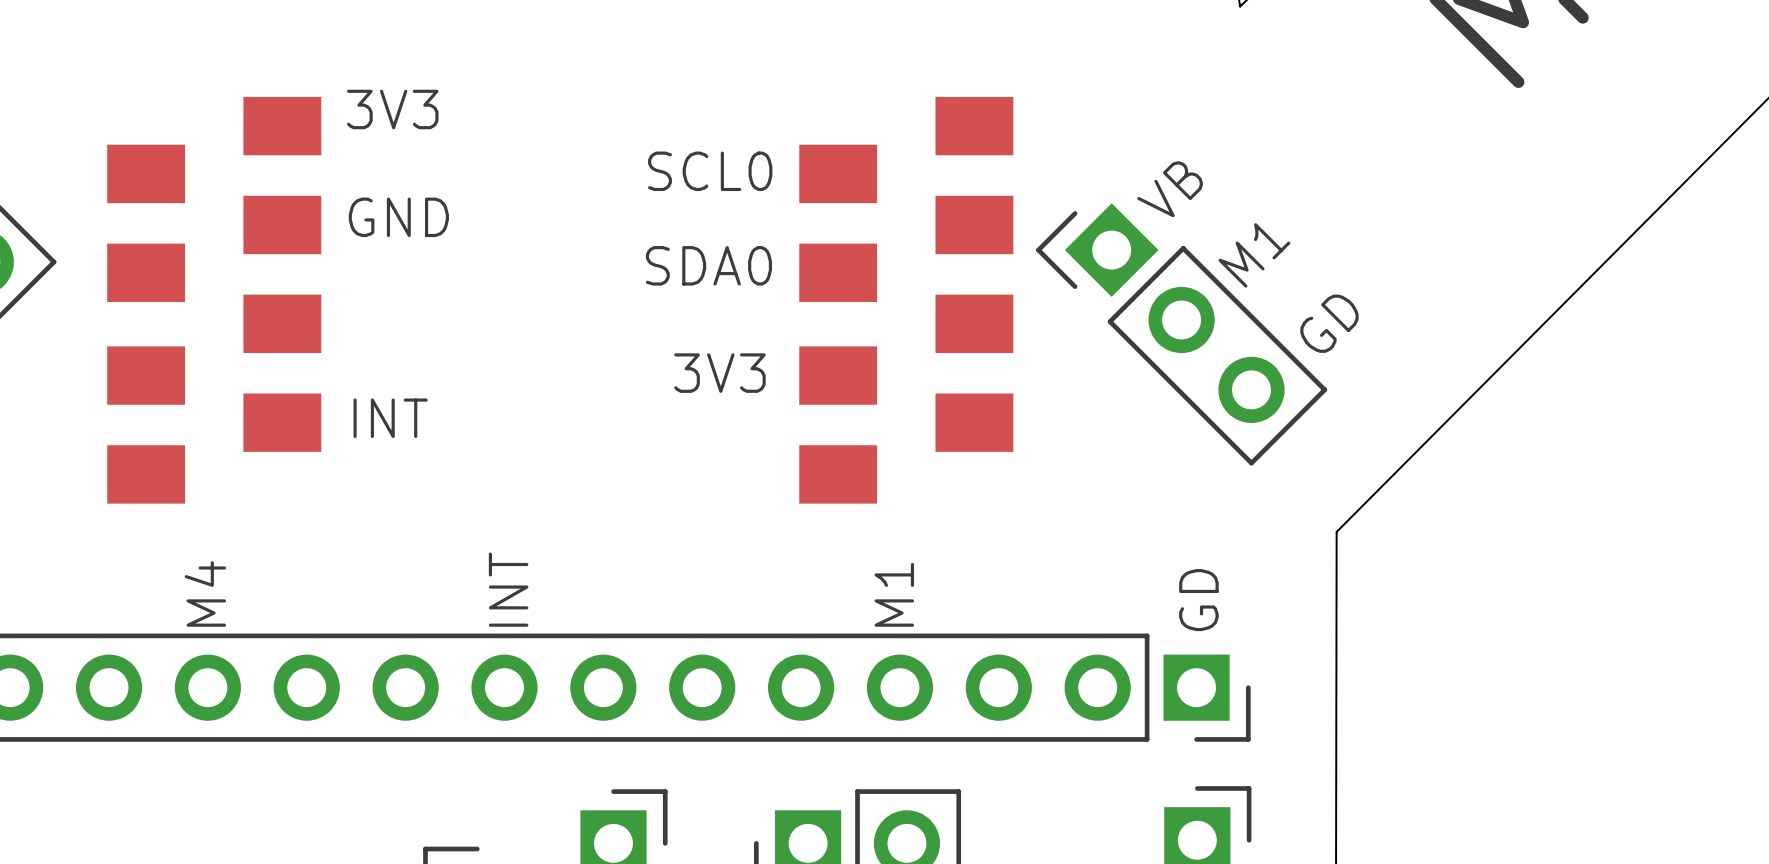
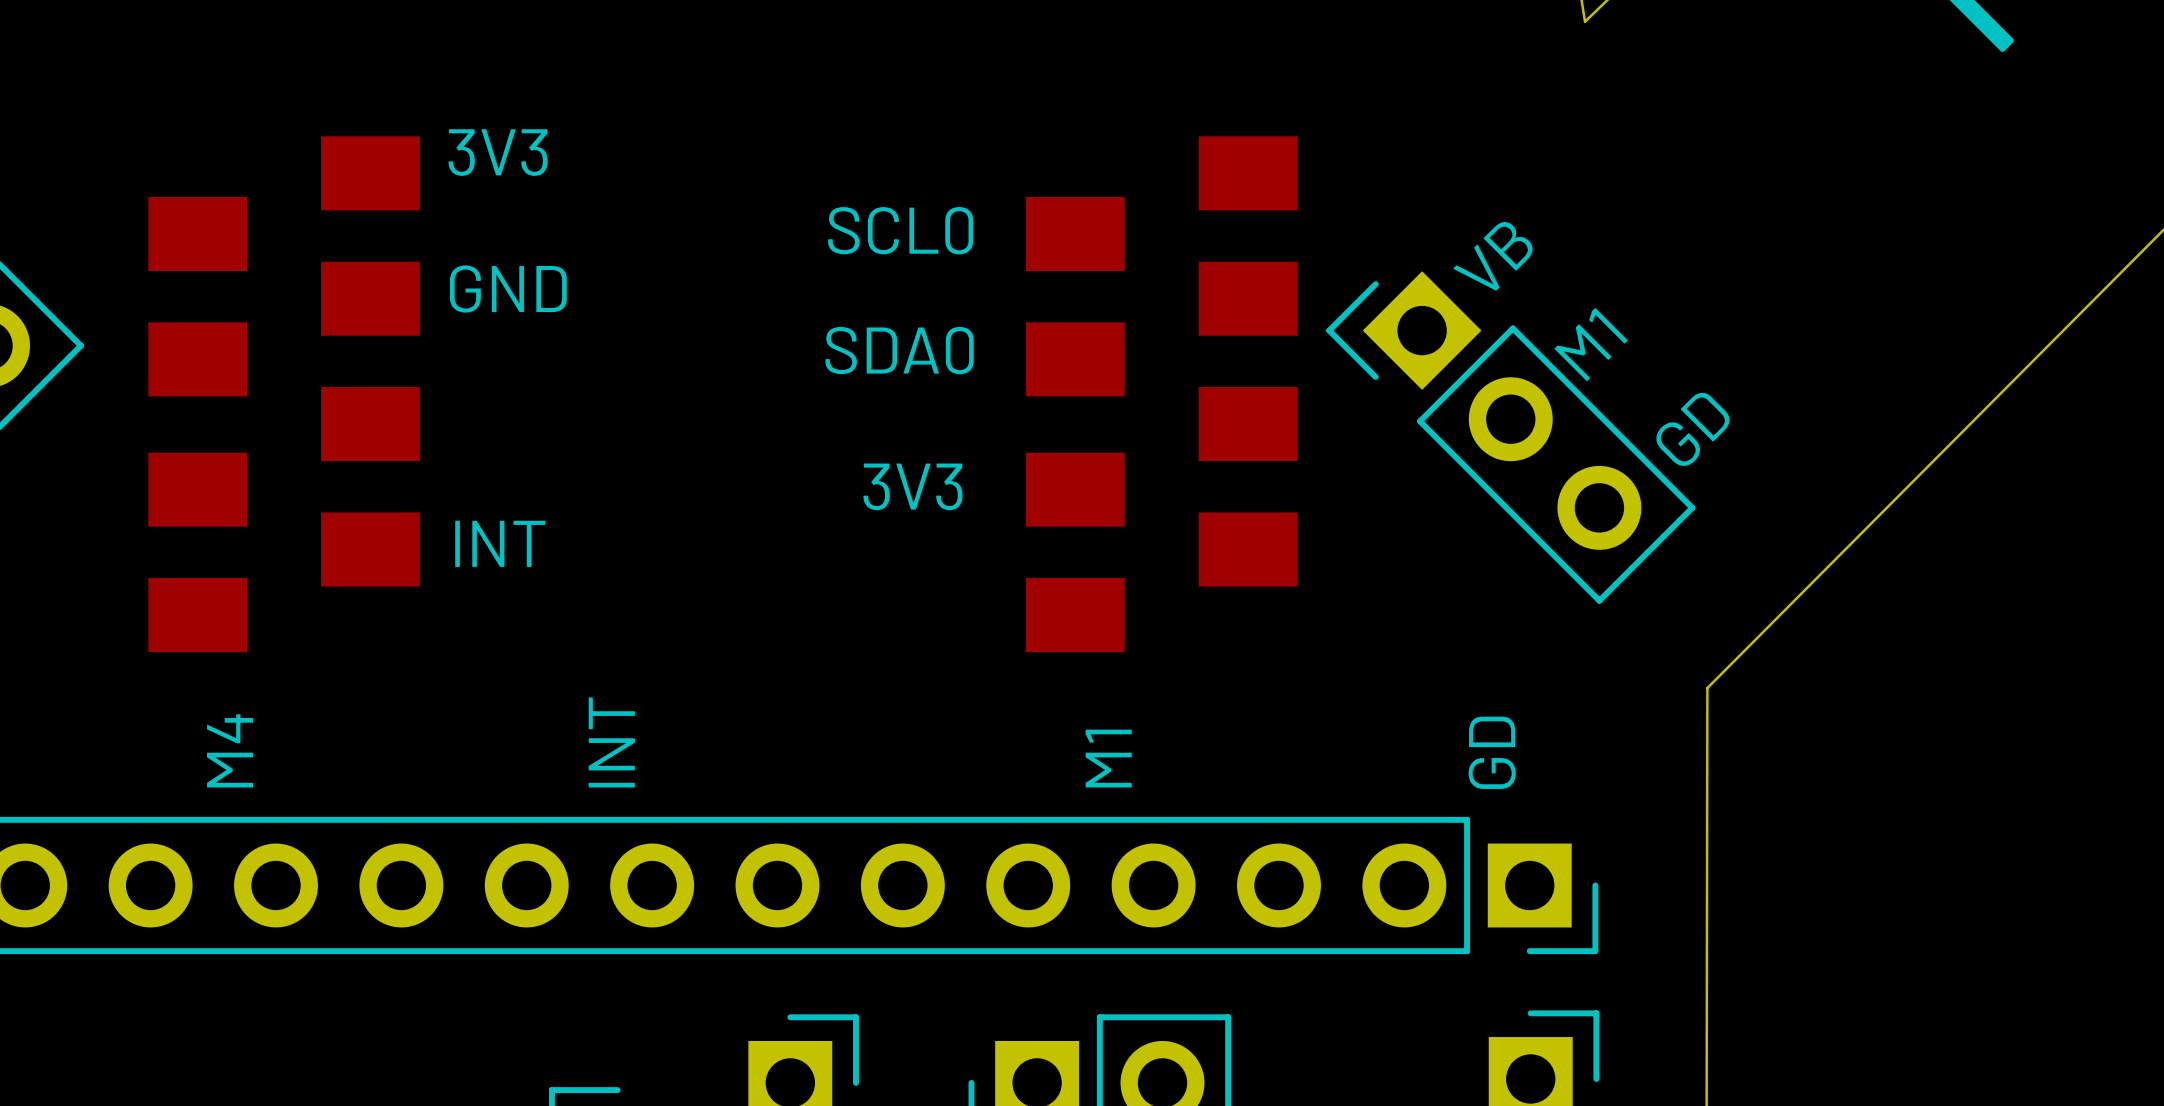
text position: INT (508, 589) -> INT (611, 742)
text position: M4 (205, 593) -> M4 (230, 750)
text position: M1 (894, 594) -> M1 (1108, 758)
text position: GD (1198, 600) -> GD (1492, 752)

